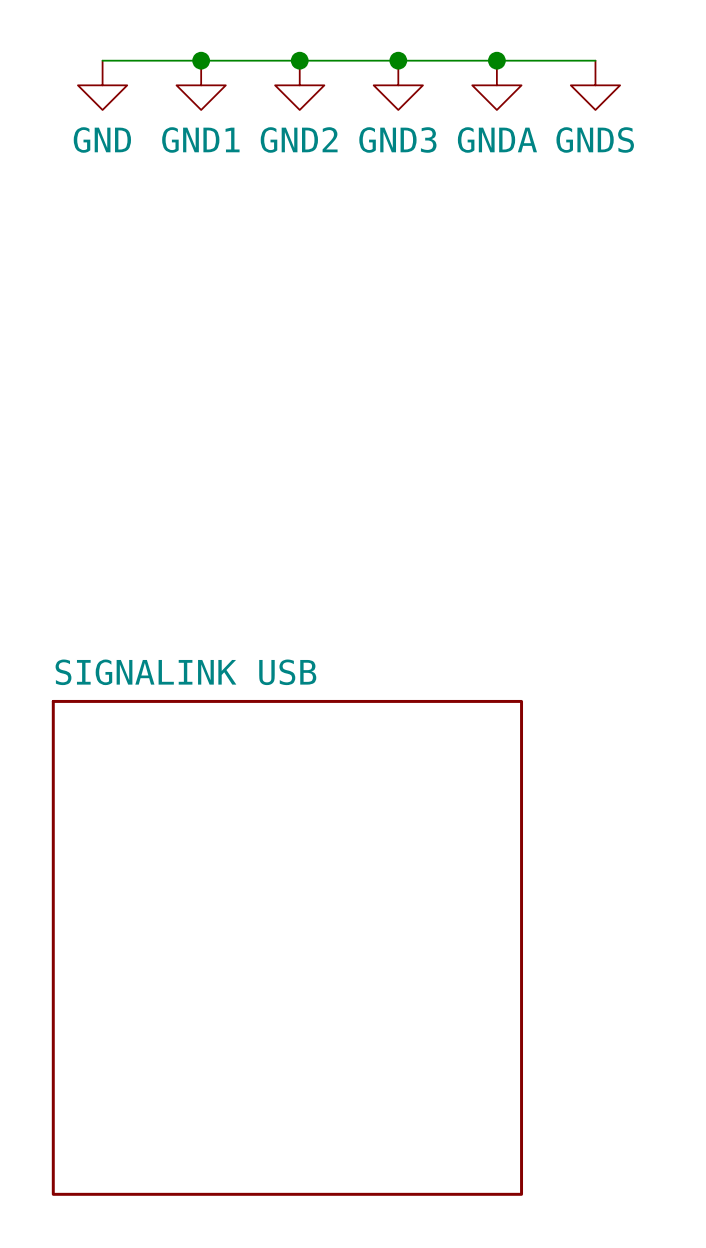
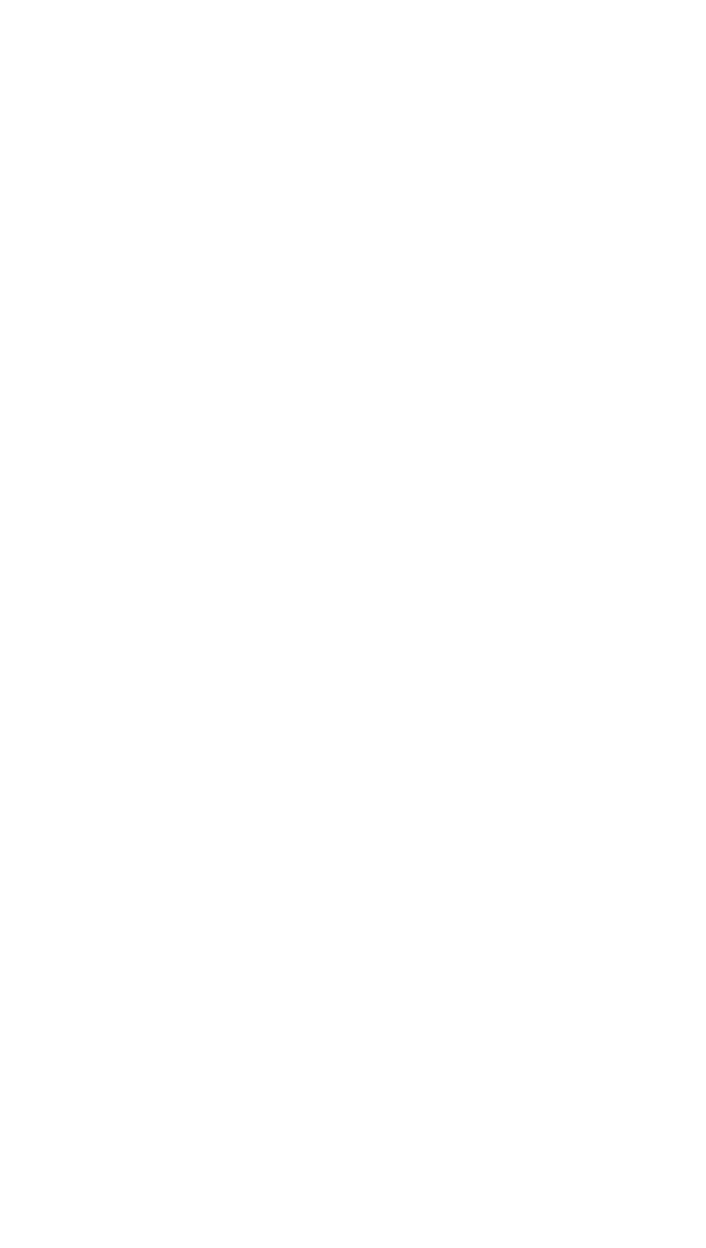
wire: (102, 60) (595, 60) -> none
junction: (201, 60) -> none
junction: (299, 60) -> none
junction: (398, 60) -> none
junction: (496, 60) -> none
power symbol: GND (102, 85) -> none
power symbol: GND1 (201, 85) -> none
power symbol: GND2 (299, 85) -> none
power symbol: GND3 (398, 85) -> none
power symbol: GNDA (496, 85) -> none
power symbol: GNDS (595, 85) -> none
sheet SIGNALINK USB: (287, 947) -> none

